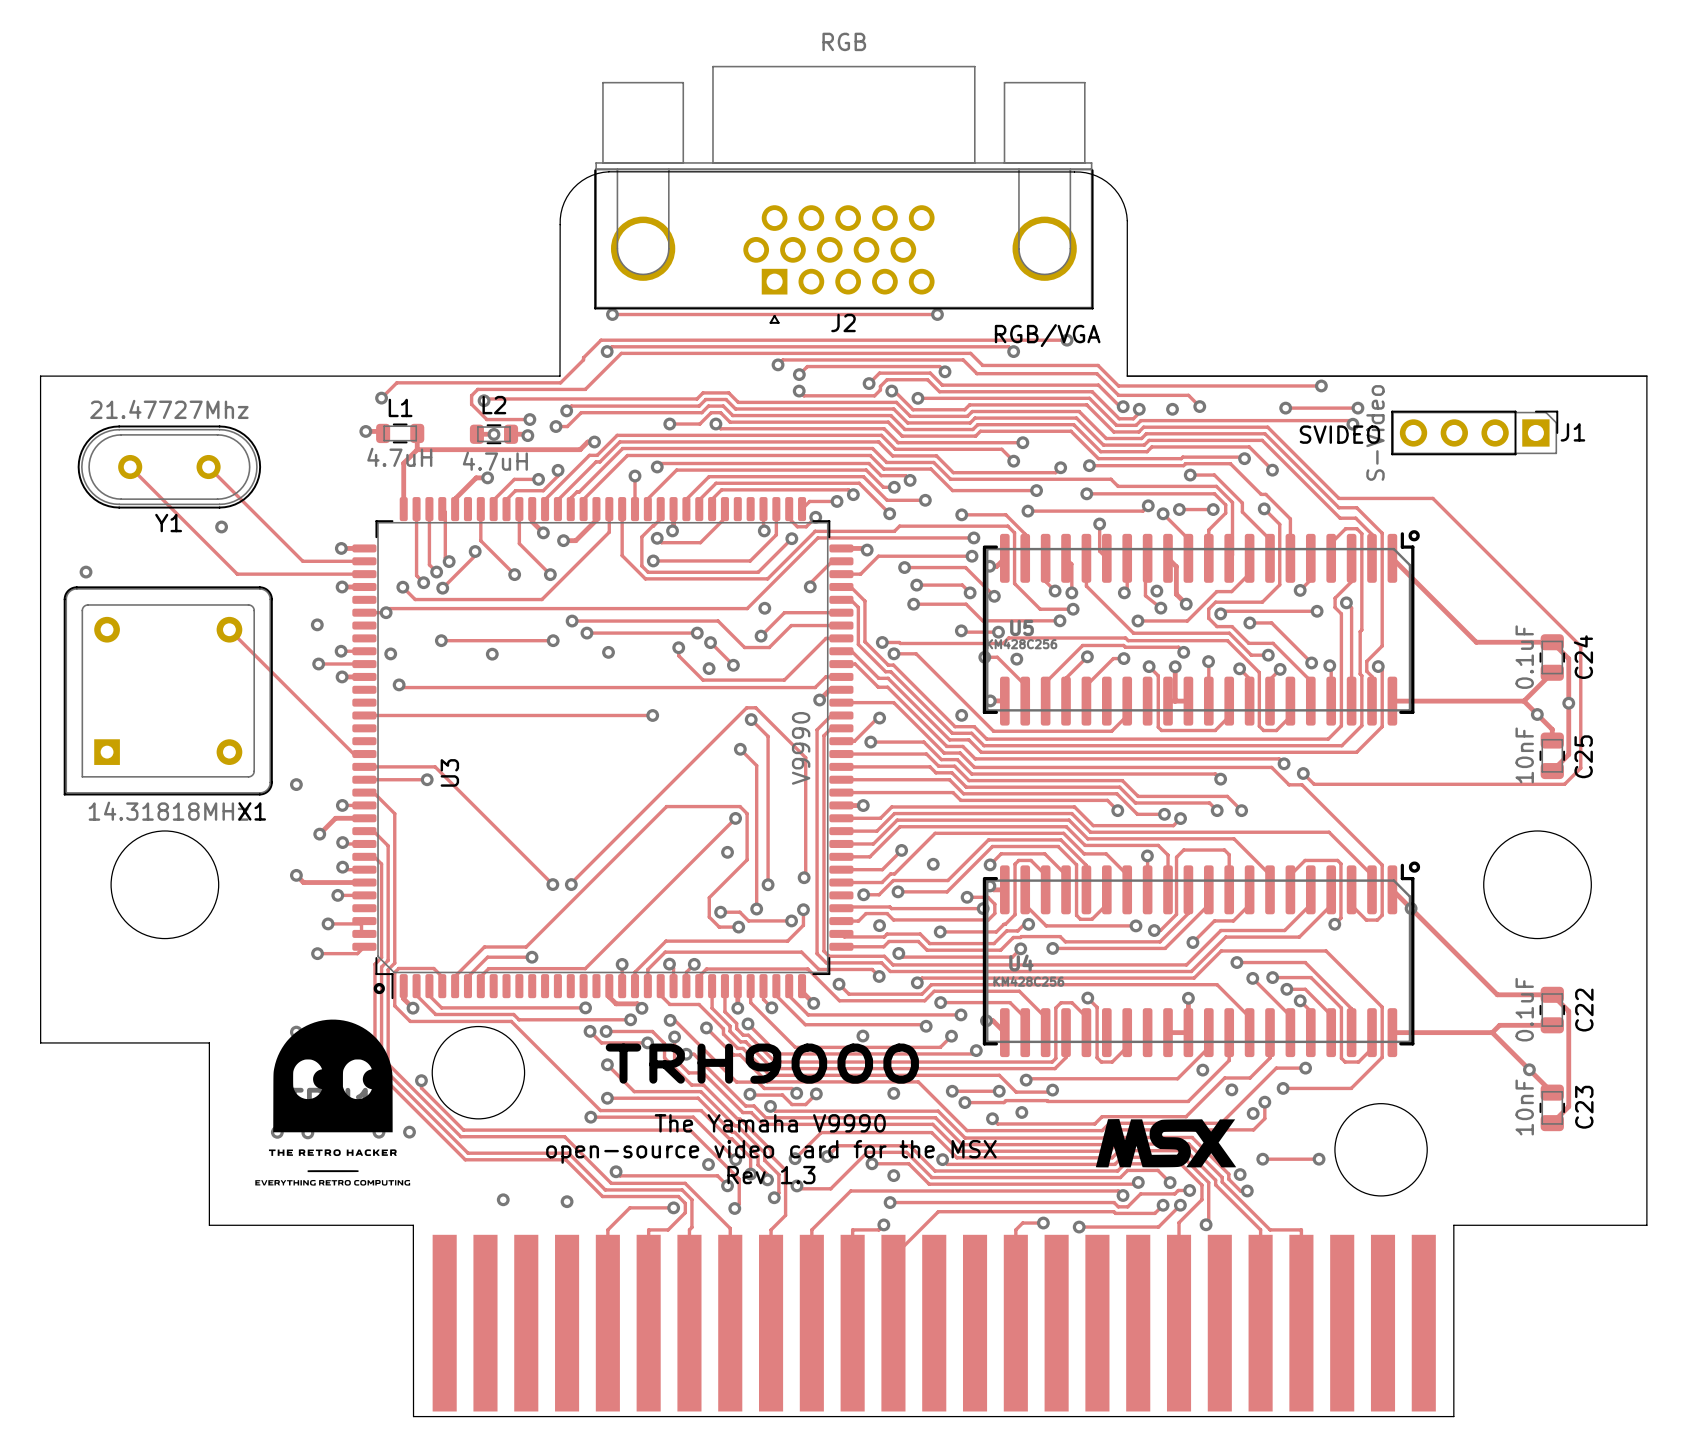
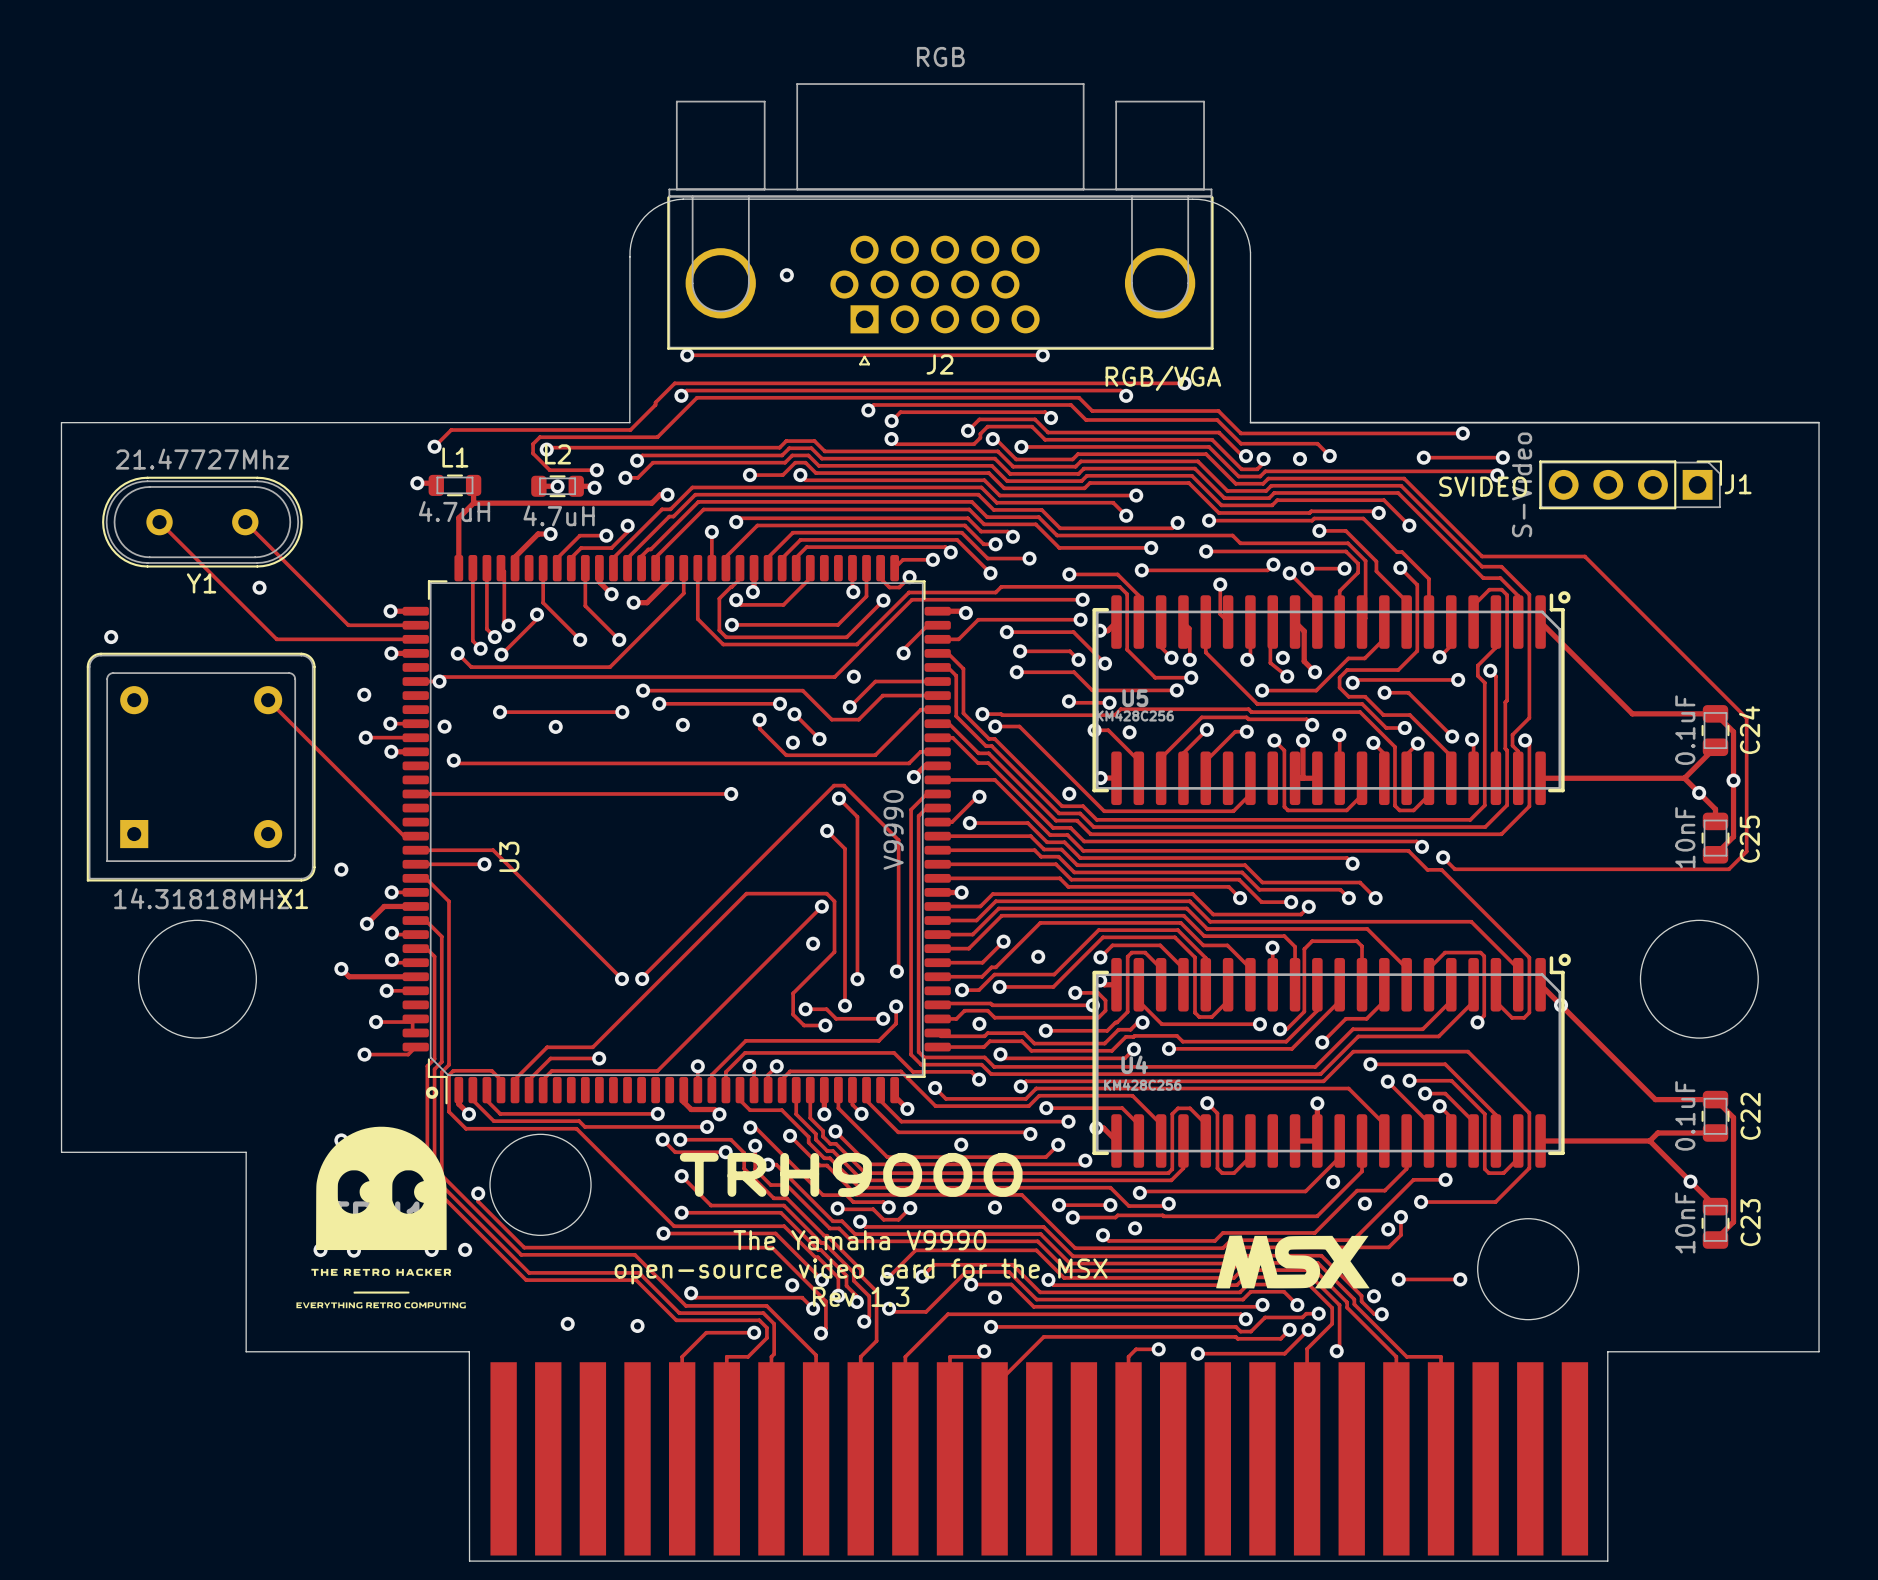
via: none -> (786, 275)

